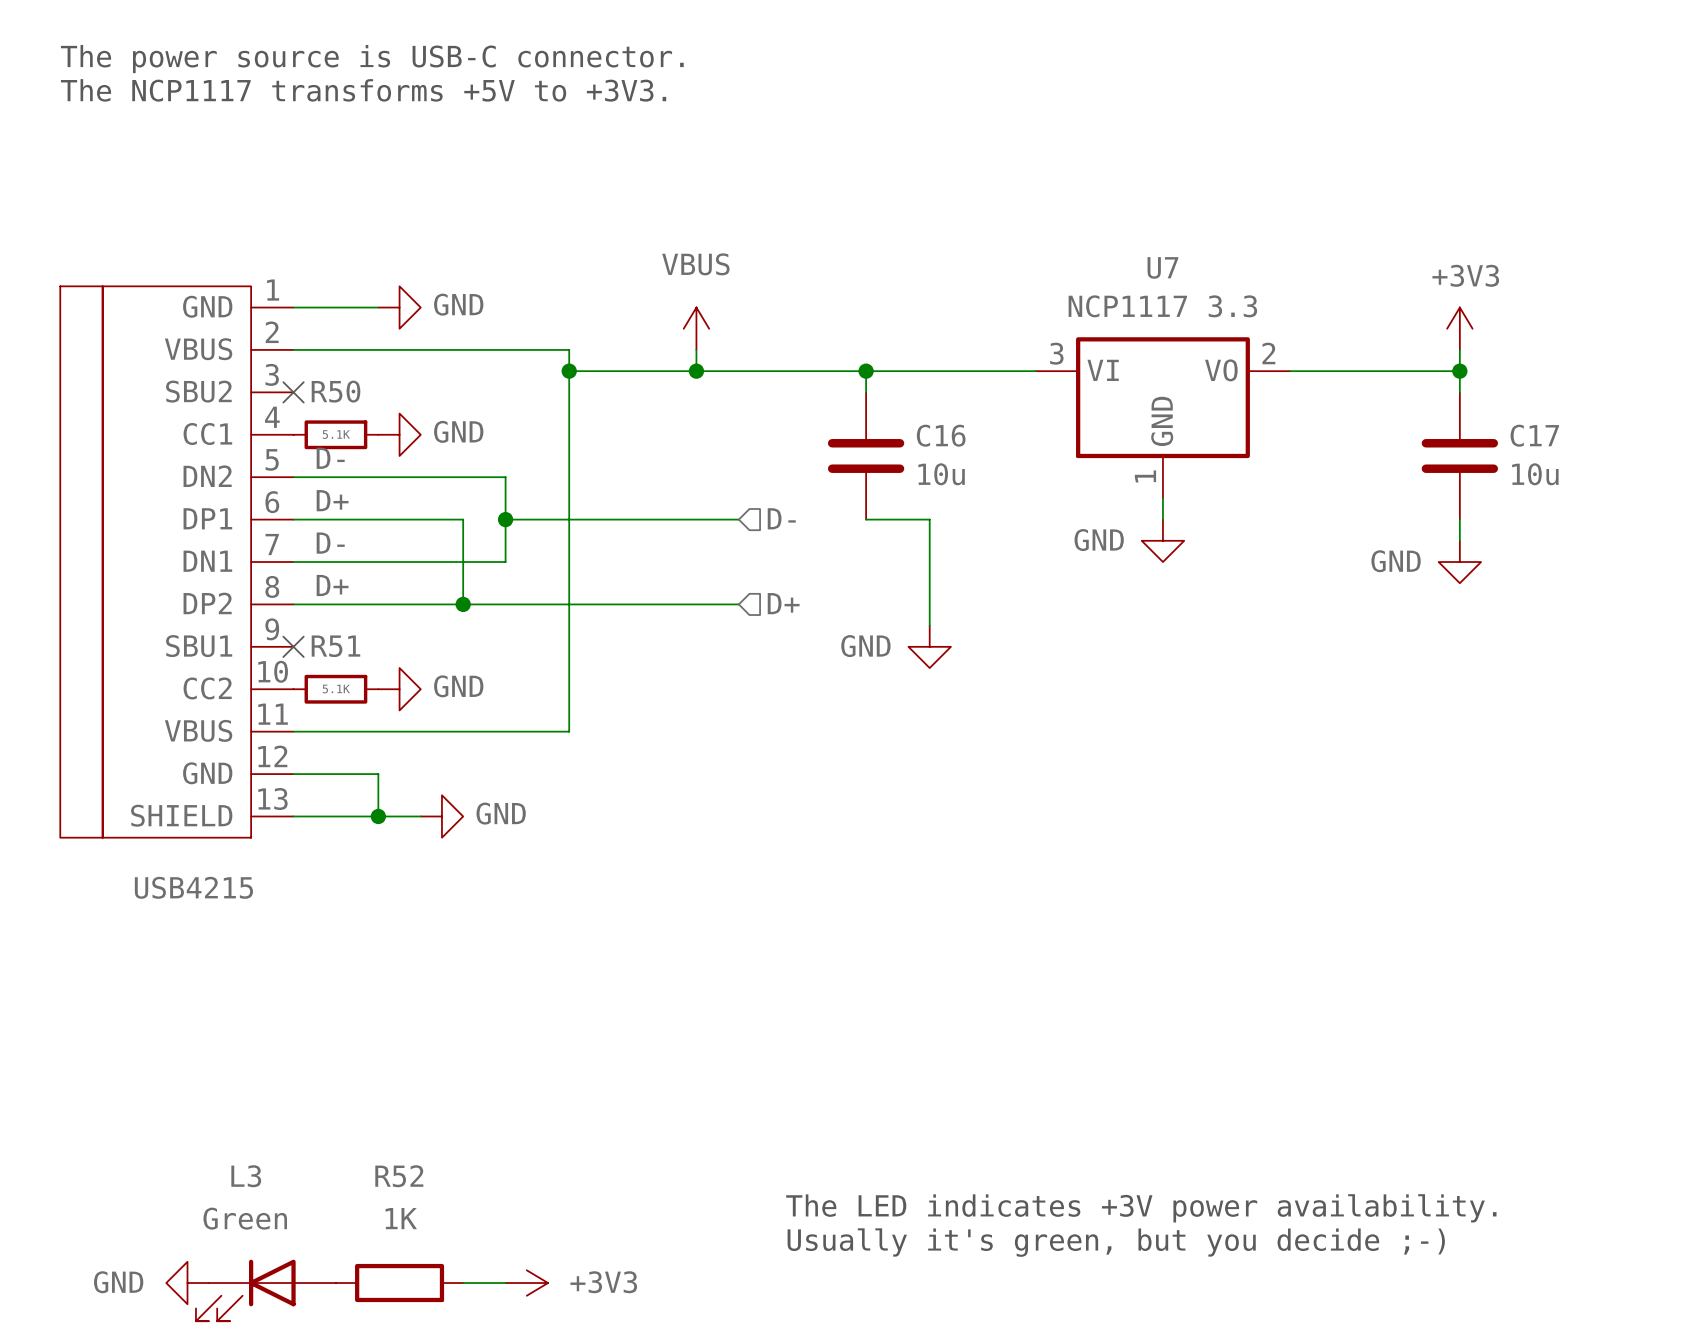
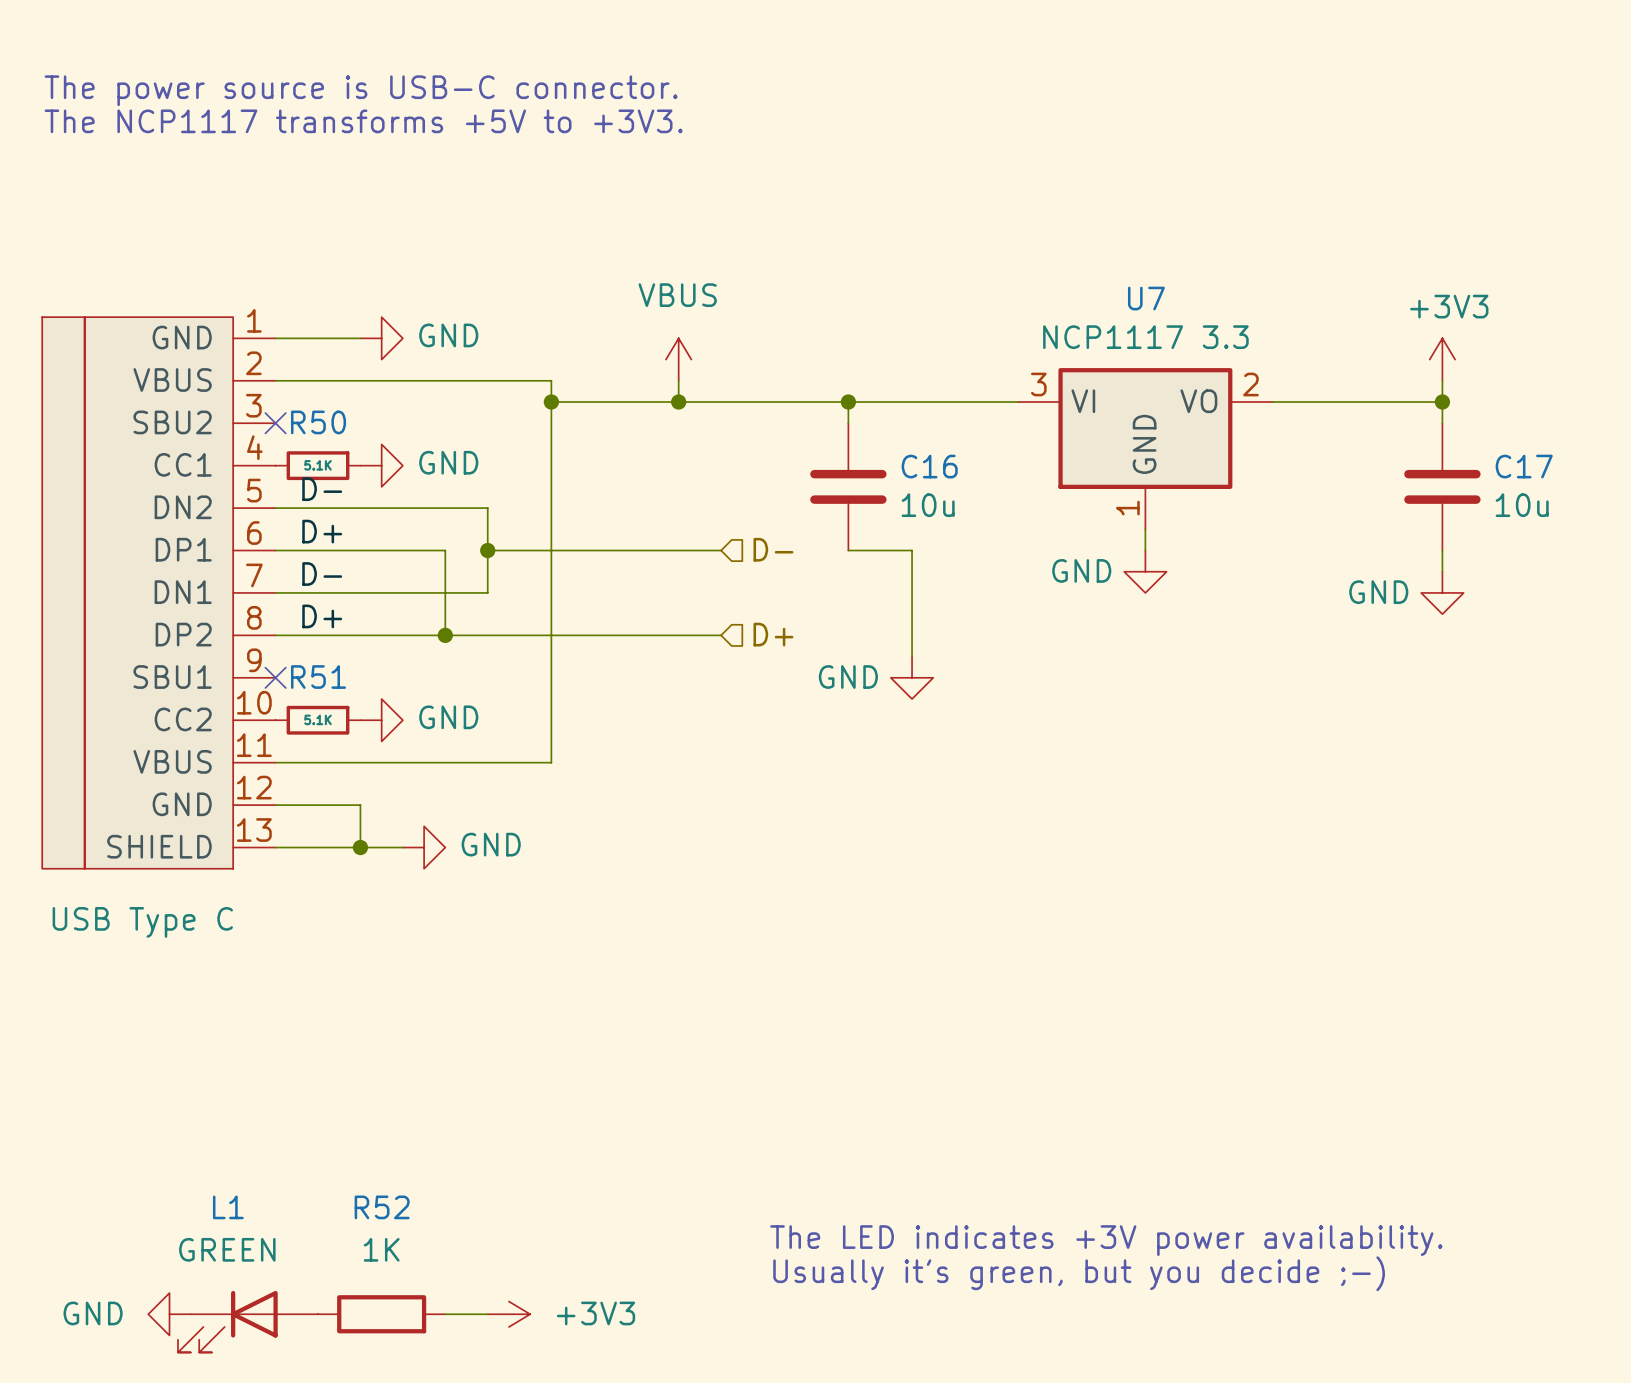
part value: USB4215 (193, 887) -> USB Type C (142, 922)
L3 name: L3 (246, 1176) -> L1 (228, 1207)
L3 value: Green (245, 1218) -> GREEN (227, 1249)

